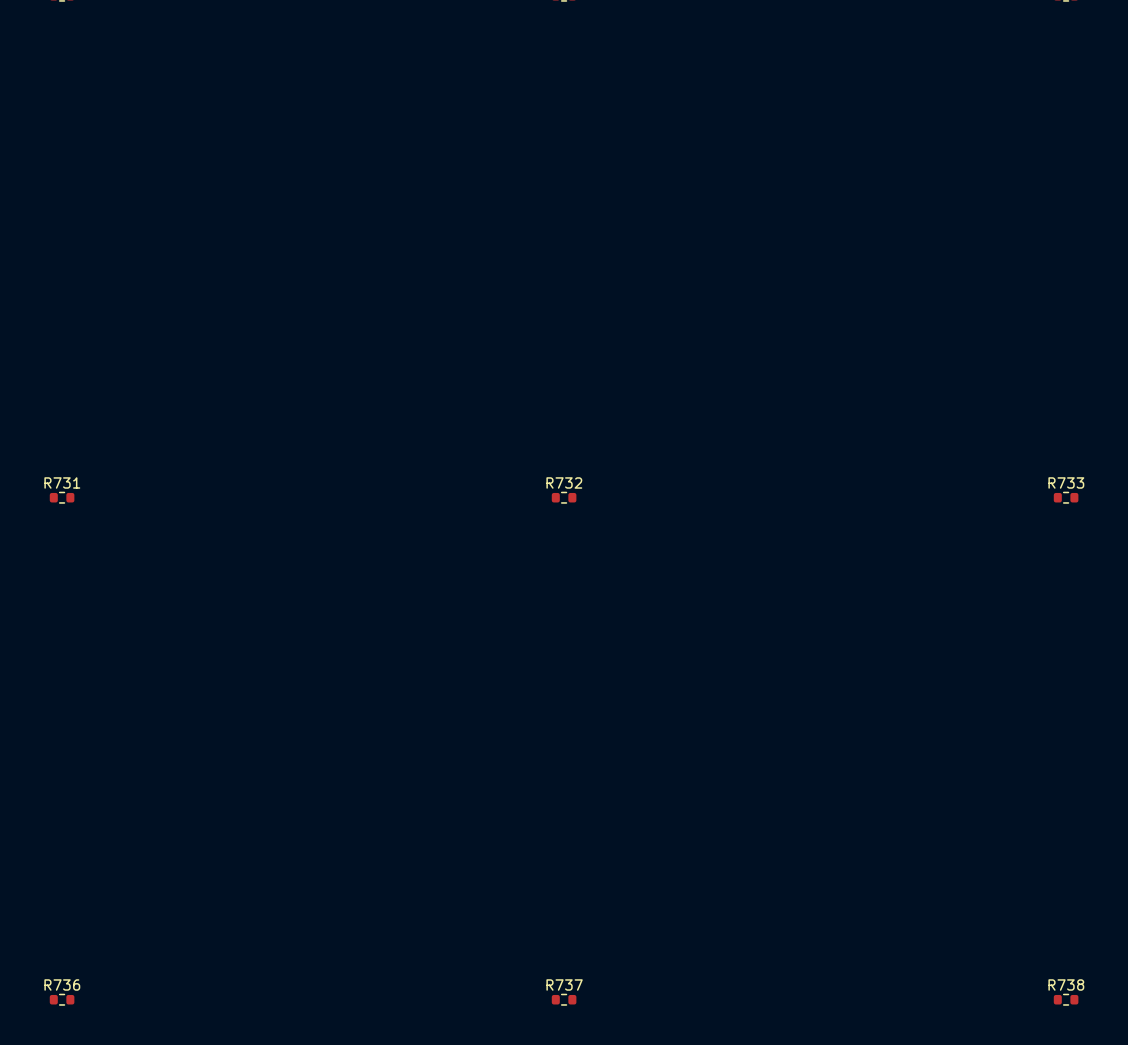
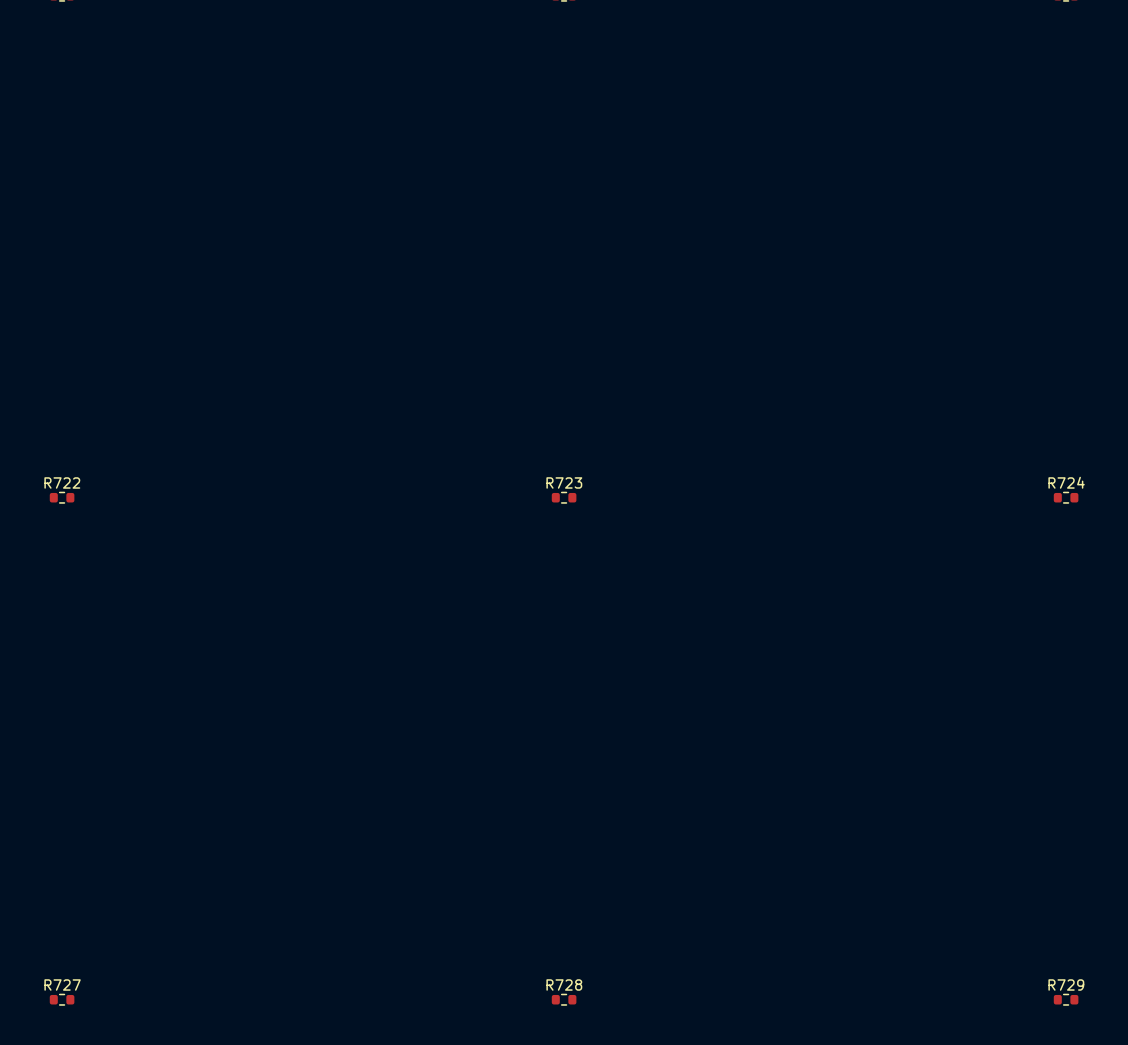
R731 name: R731 (62, 482) -> R722 (62, 482)
R732 name: R732 (564, 482) -> R723 (564, 482)
R733 name: R733 (1066, 482) -> R724 (1066, 482)
R736 name: R736 (62, 985) -> R727 (62, 985)
R737 name: R737 (564, 985) -> R728 (564, 985)
R738 name: R738 (1066, 985) -> R729 (1066, 985)

